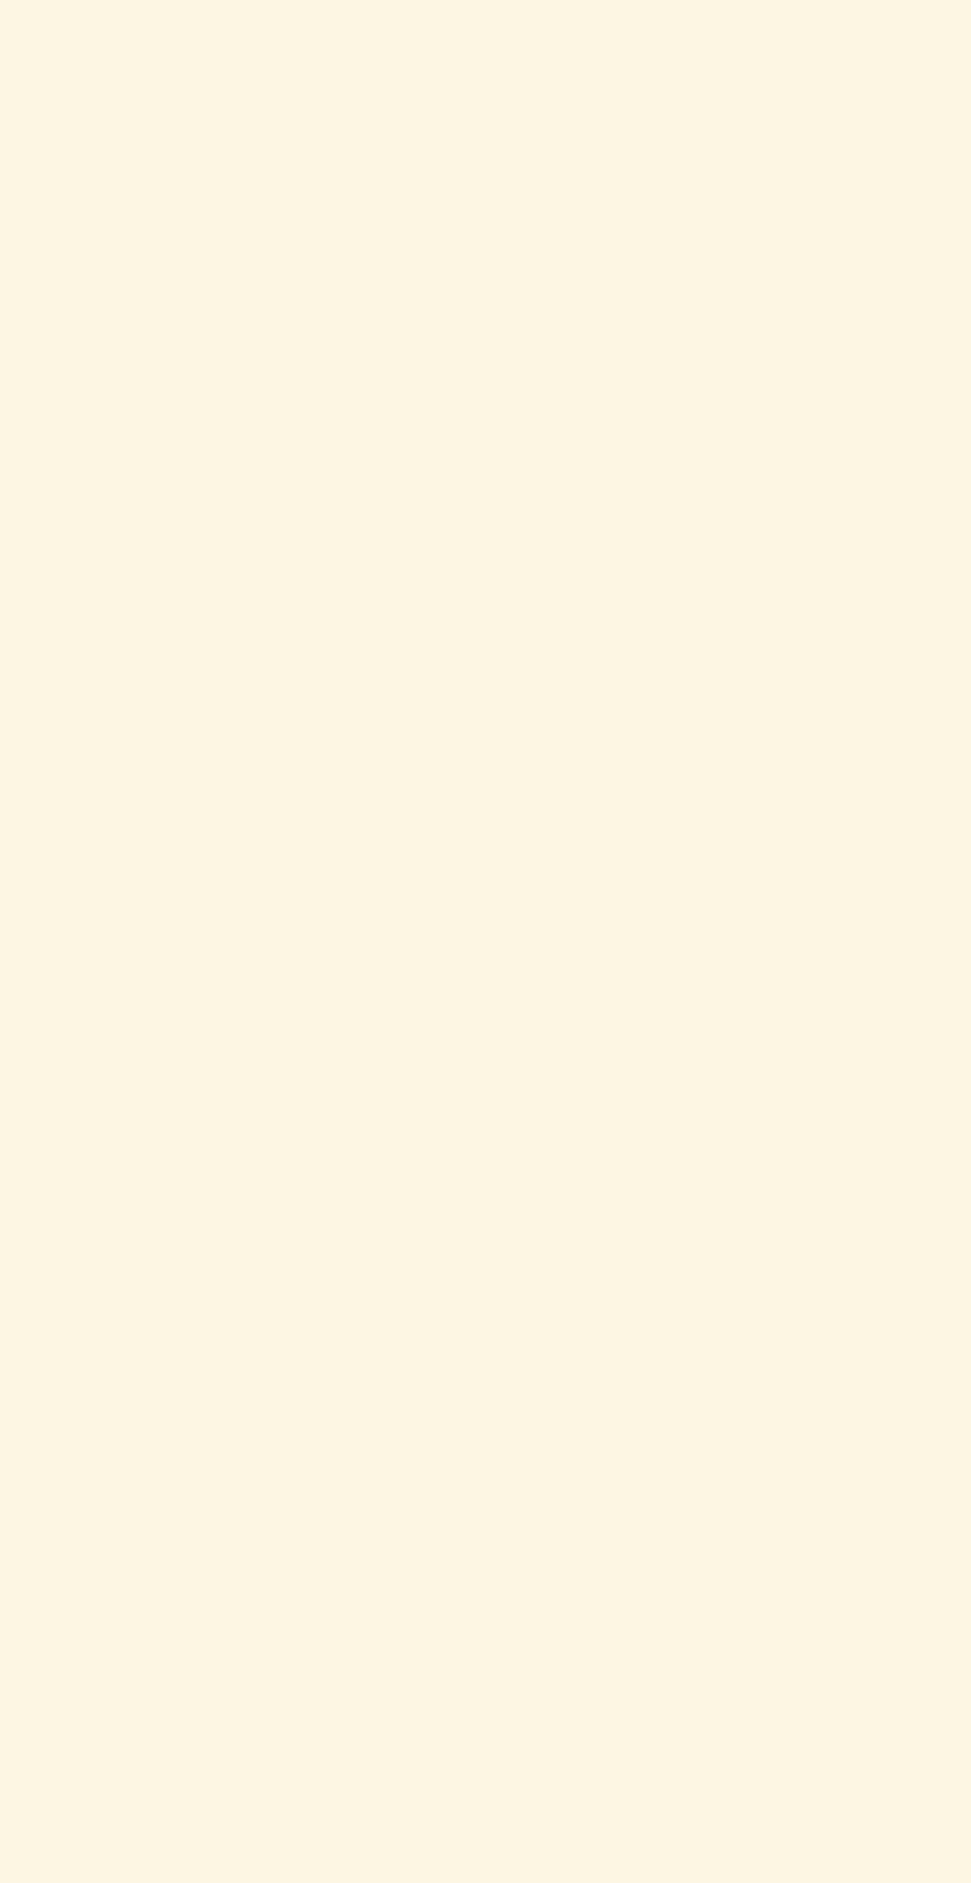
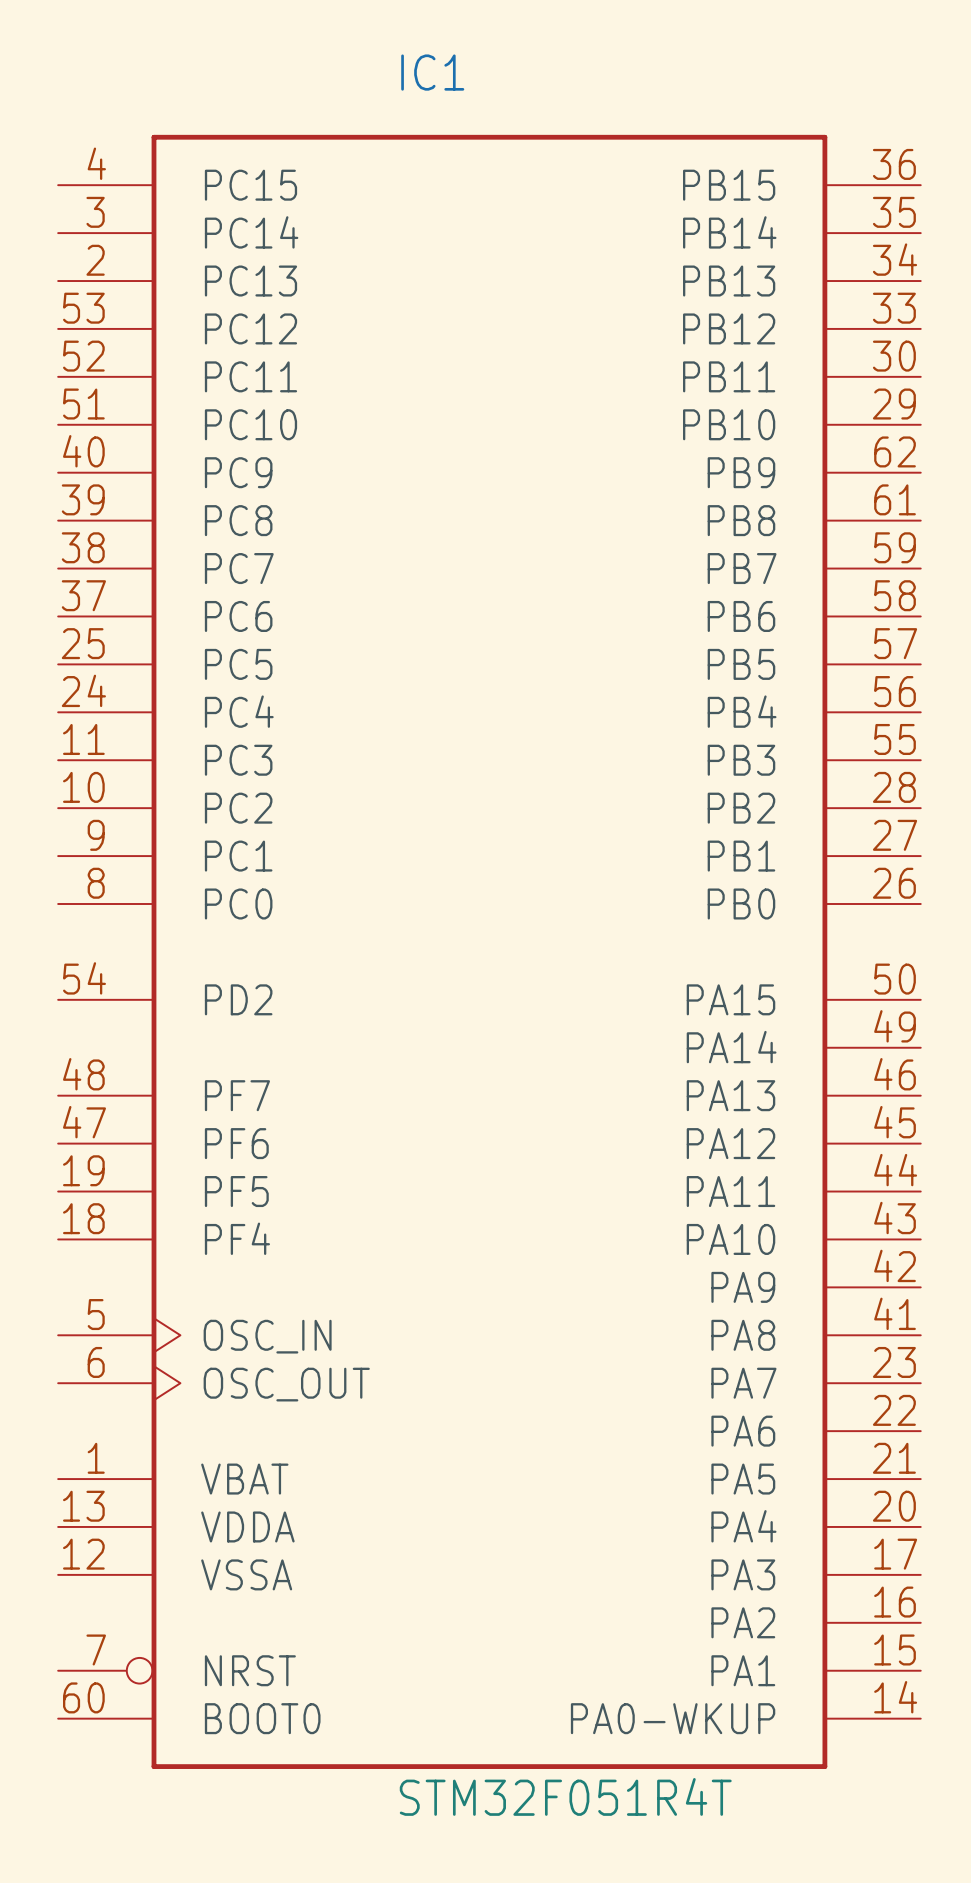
IC1: none -> STM32F051R4T (489, 951)

